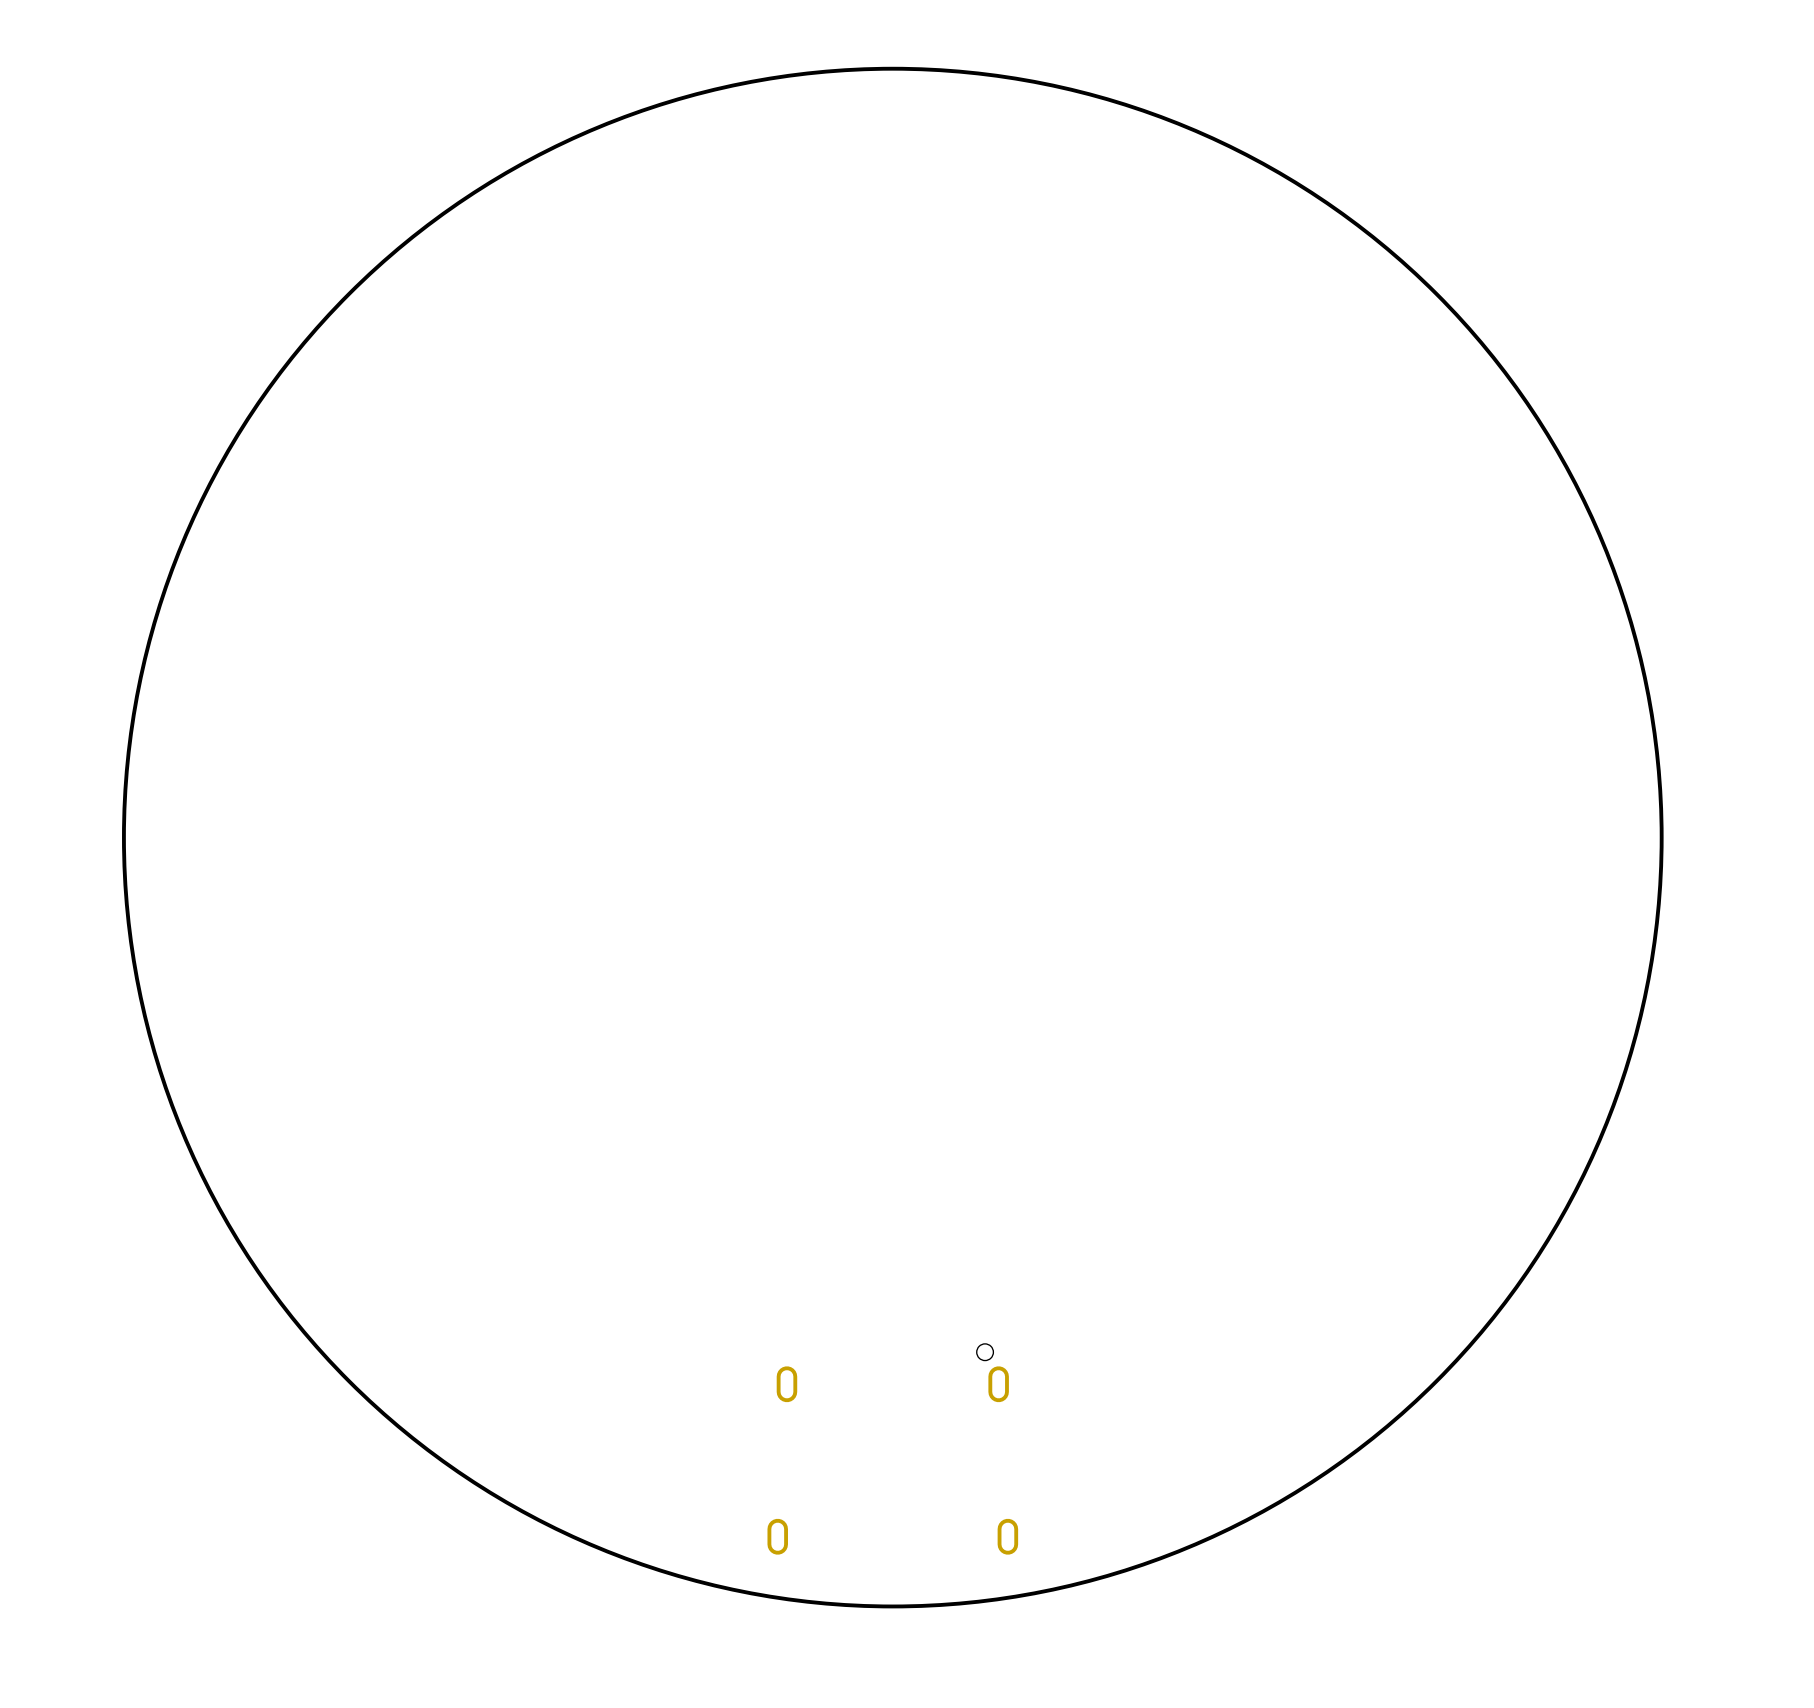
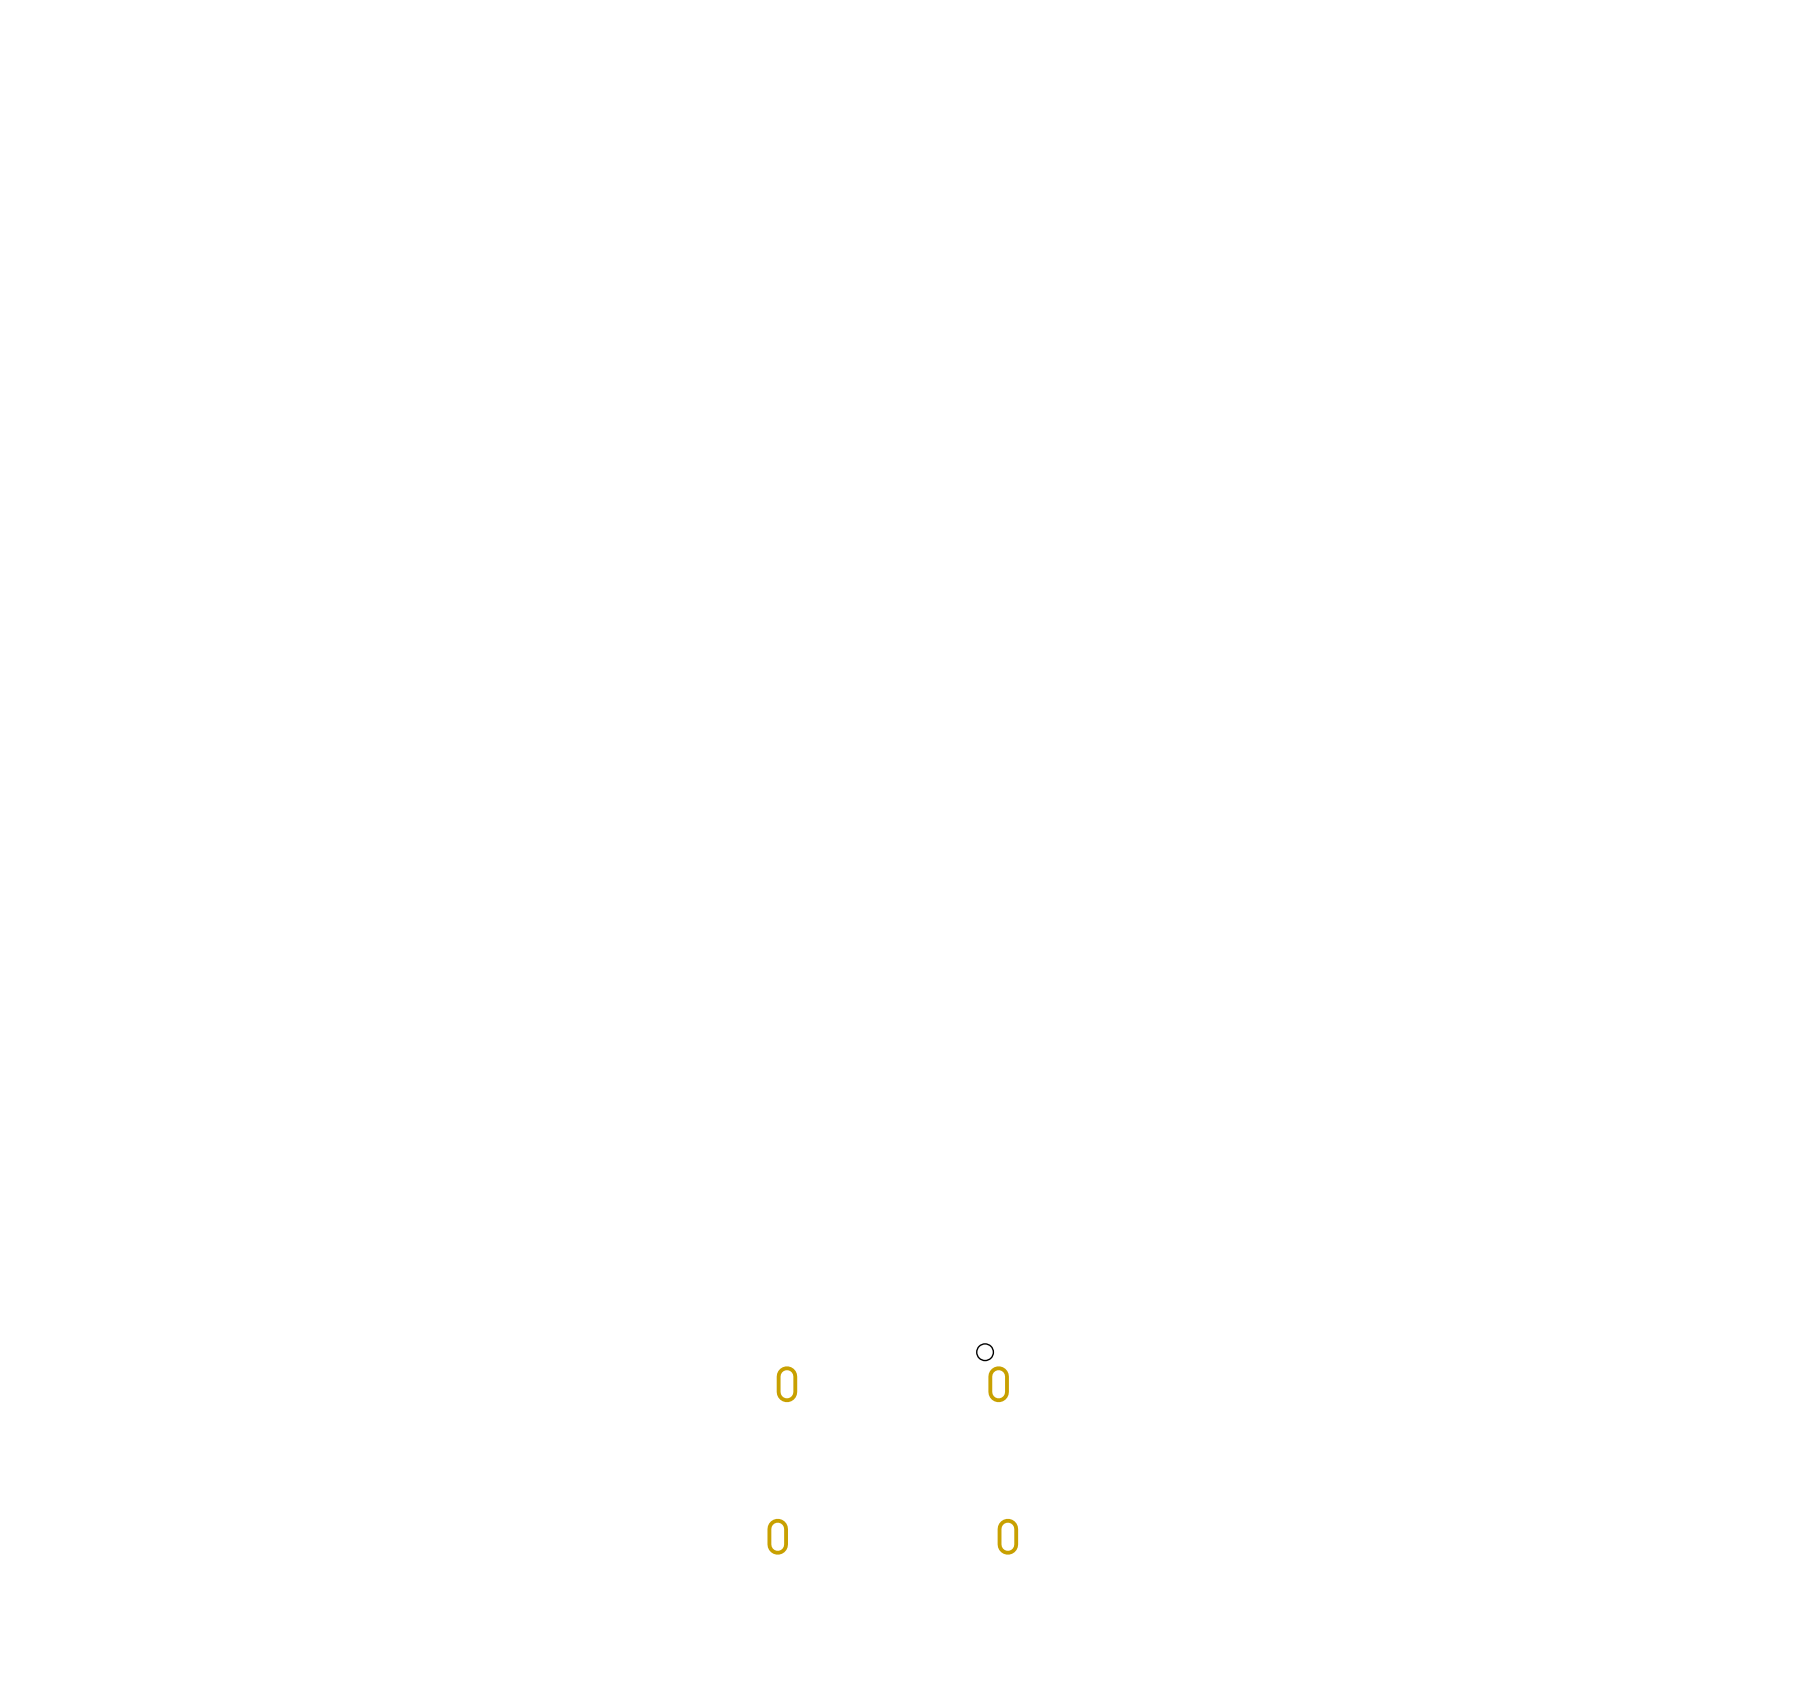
round board edge: [122, 66, 1664, 1609] -> none

